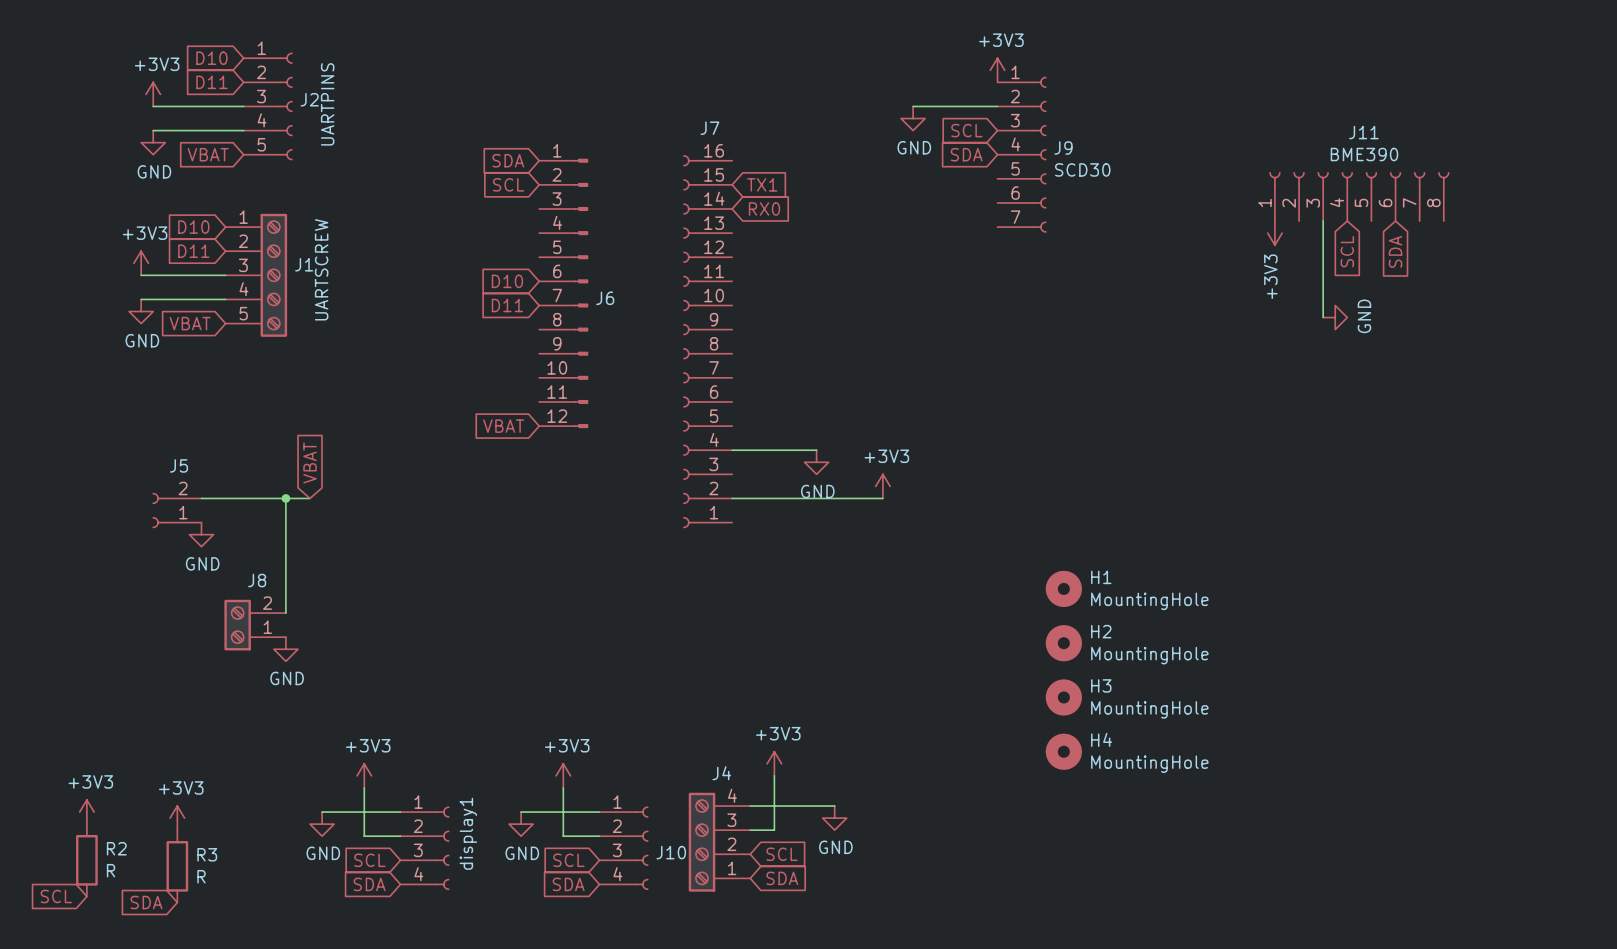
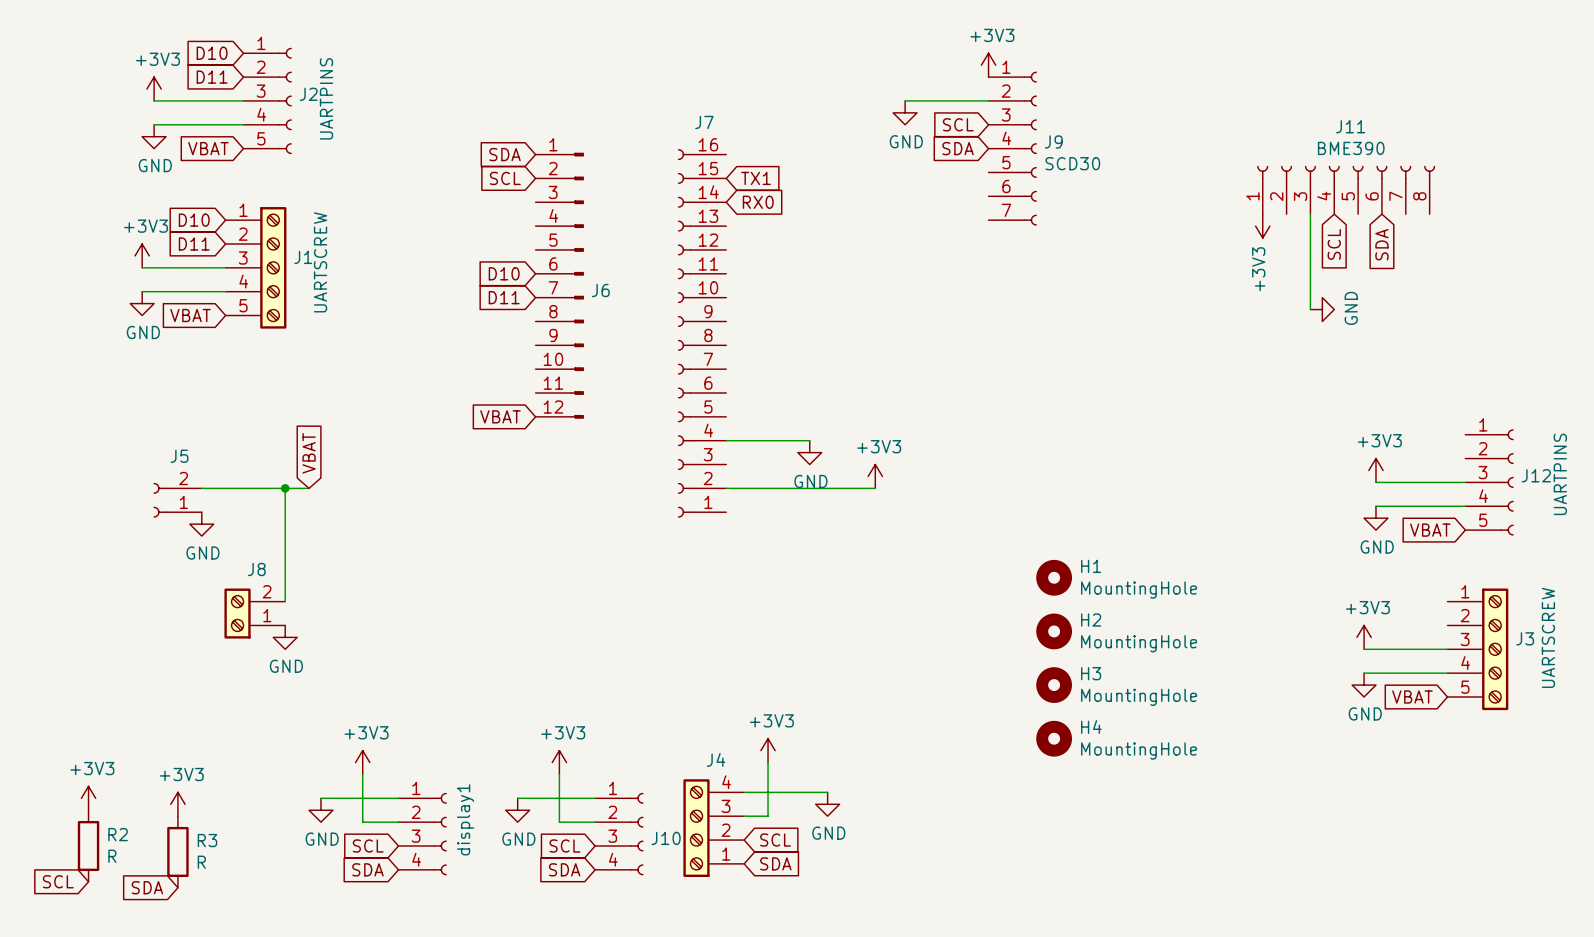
power symbol: none -> +3V3 (1375, 470)
wire: none -> (1375, 482) (1465, 482)
J12: none -> UARTPINS (1489, 482)
wire: none -> (1375, 506) (1465, 506)
power symbol: none -> GND (1375, 518)
global label: none -> VBAT (1430, 530)
power symbol: none -> +3V3 (1364, 637)
wire: none -> (1364, 649) (1447, 649)
J3: none -> UARTSCREW (1477, 649)
wire: none -> (1364, 673) (1447, 673)
power symbol: none -> GND (1364, 685)
global label: none -> VBAT (1412, 696)

